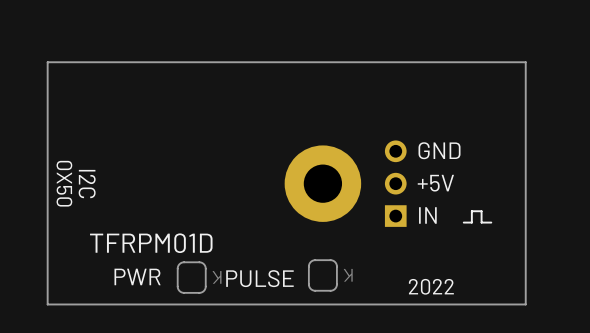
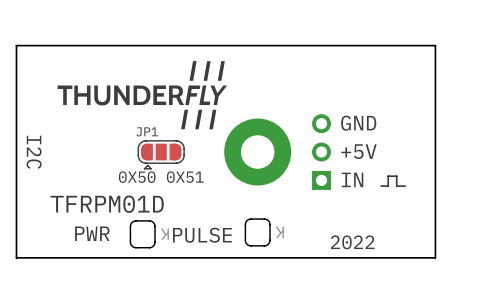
drawing: none -> [57, 61, 227, 130]
text: 0X50 (64, 183) -> I2C (34, 152)
text: I2C (87, 184) -> none
JP1: none -> (161, 154)
text: none -> 0X50 0X51 (161, 177)

